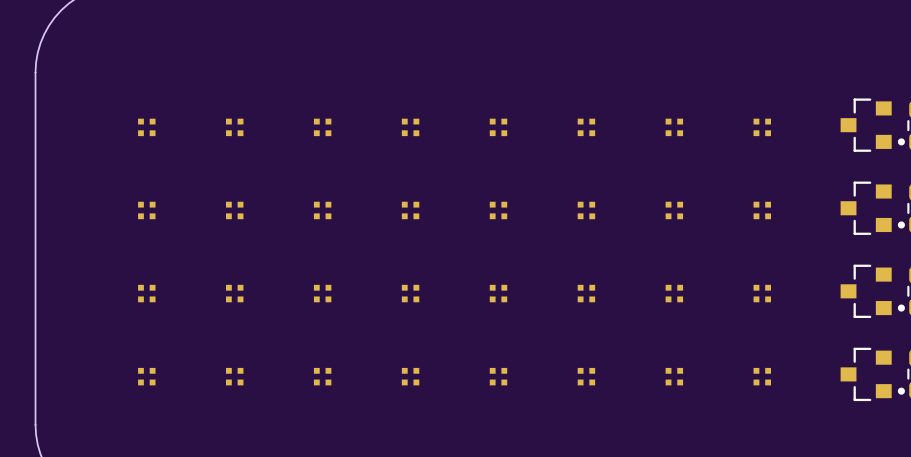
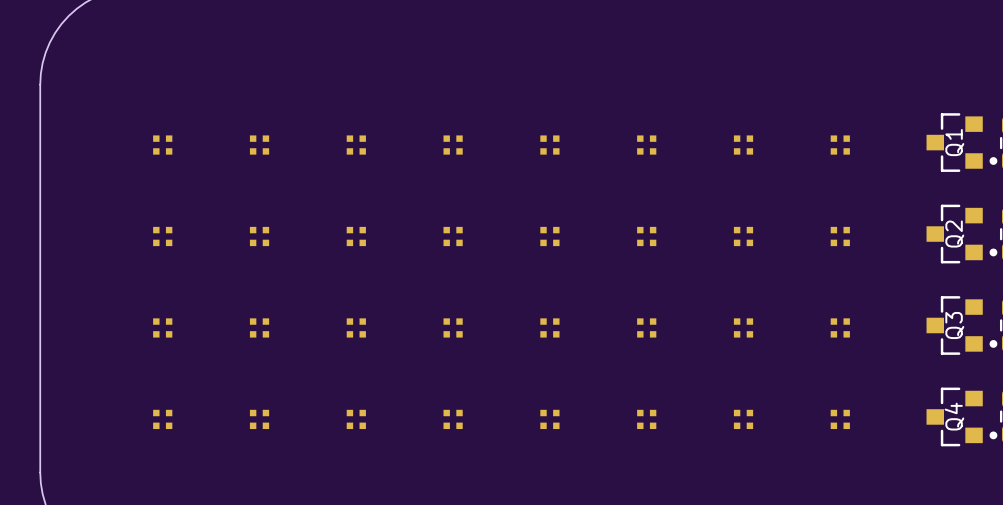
Q1 name: none -> Q1 (954, 142)
Q2 name: none -> Q2 (954, 234)
Q3 name: none -> Q3 (954, 325)
Q4 name: none -> Q4 (954, 416)

